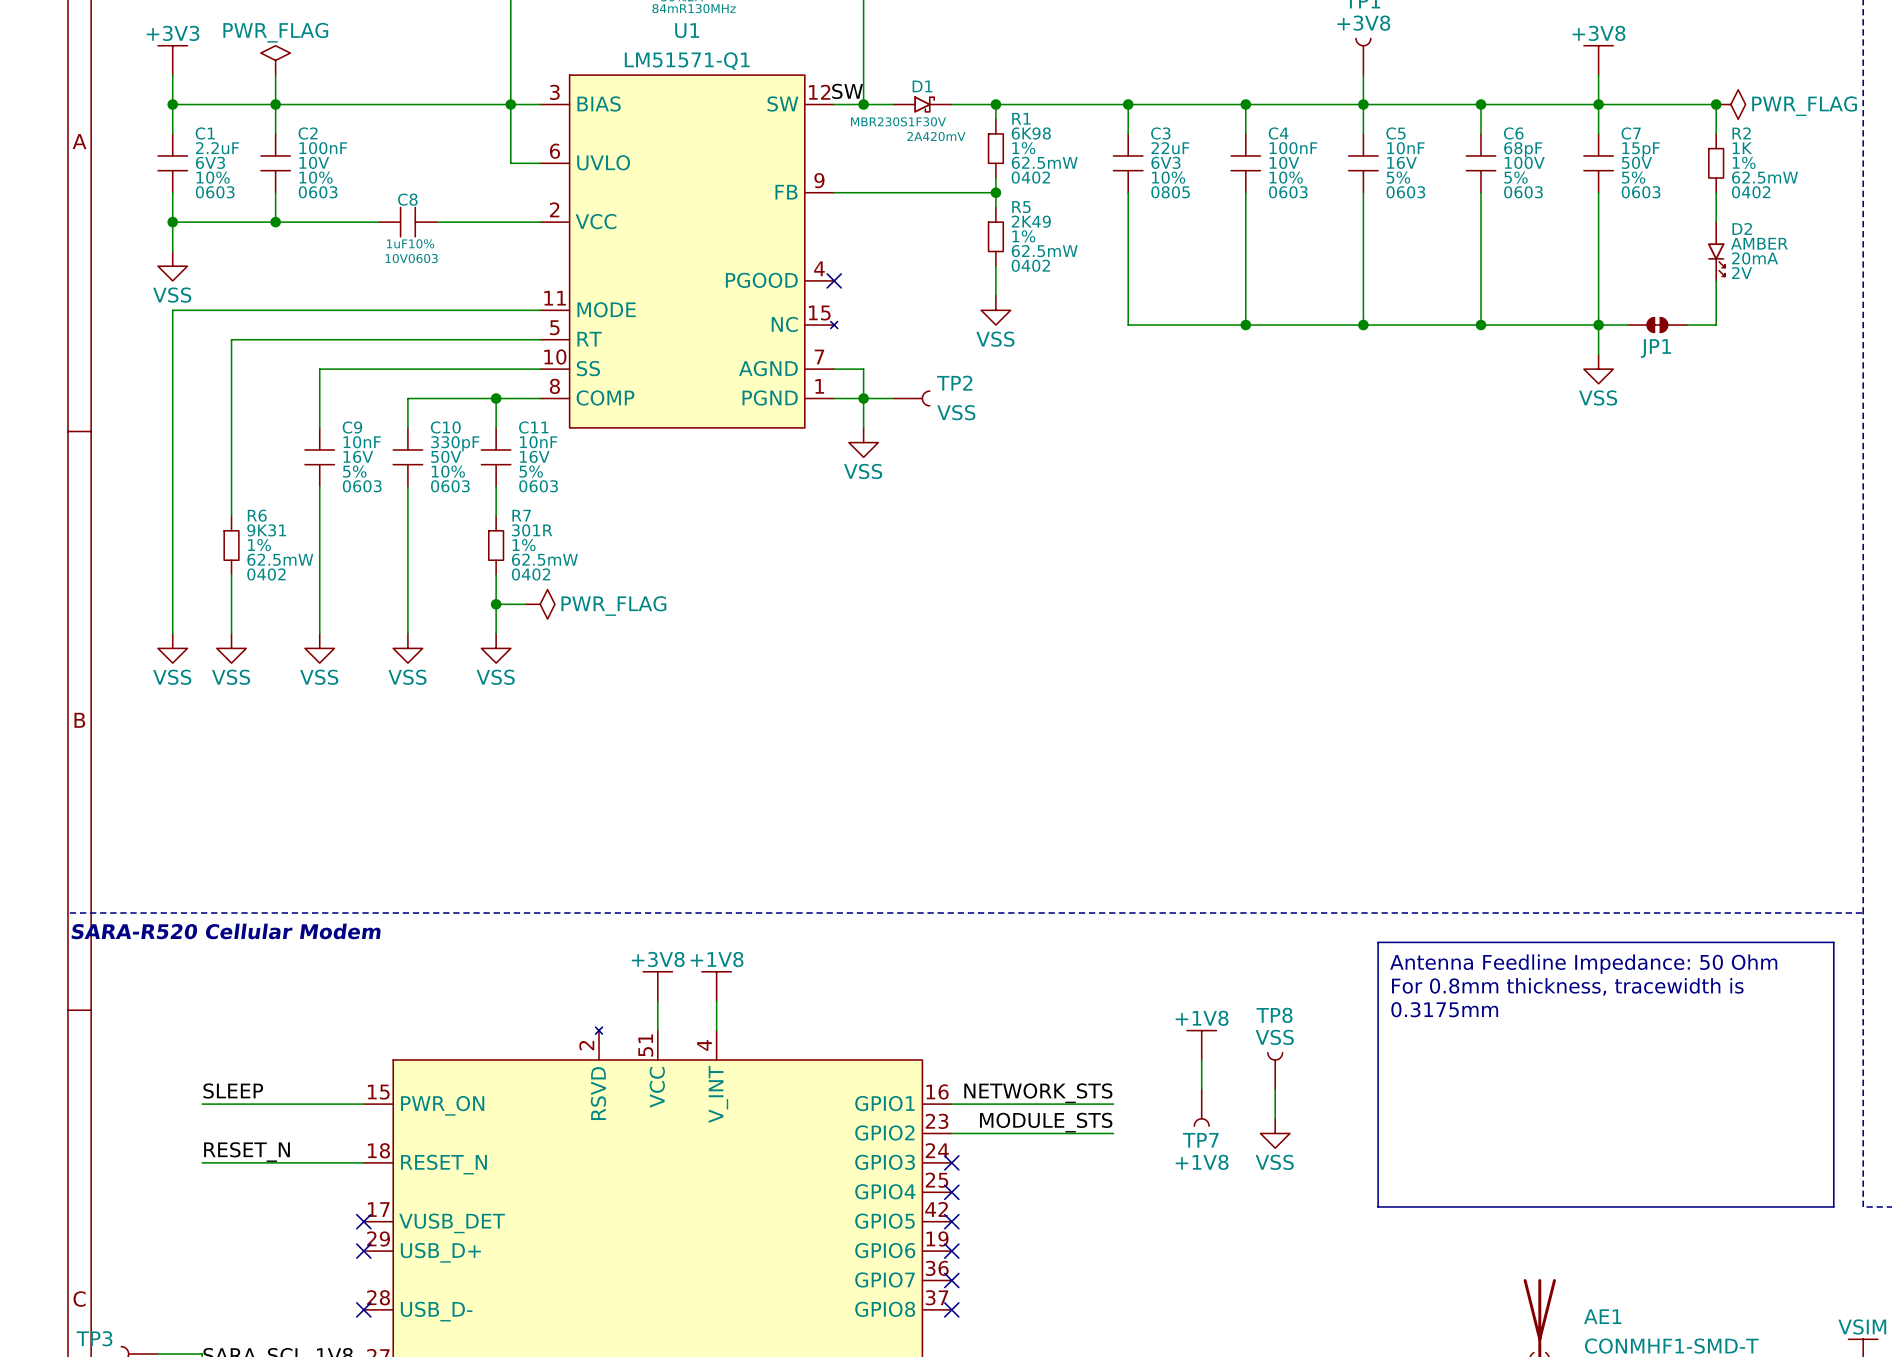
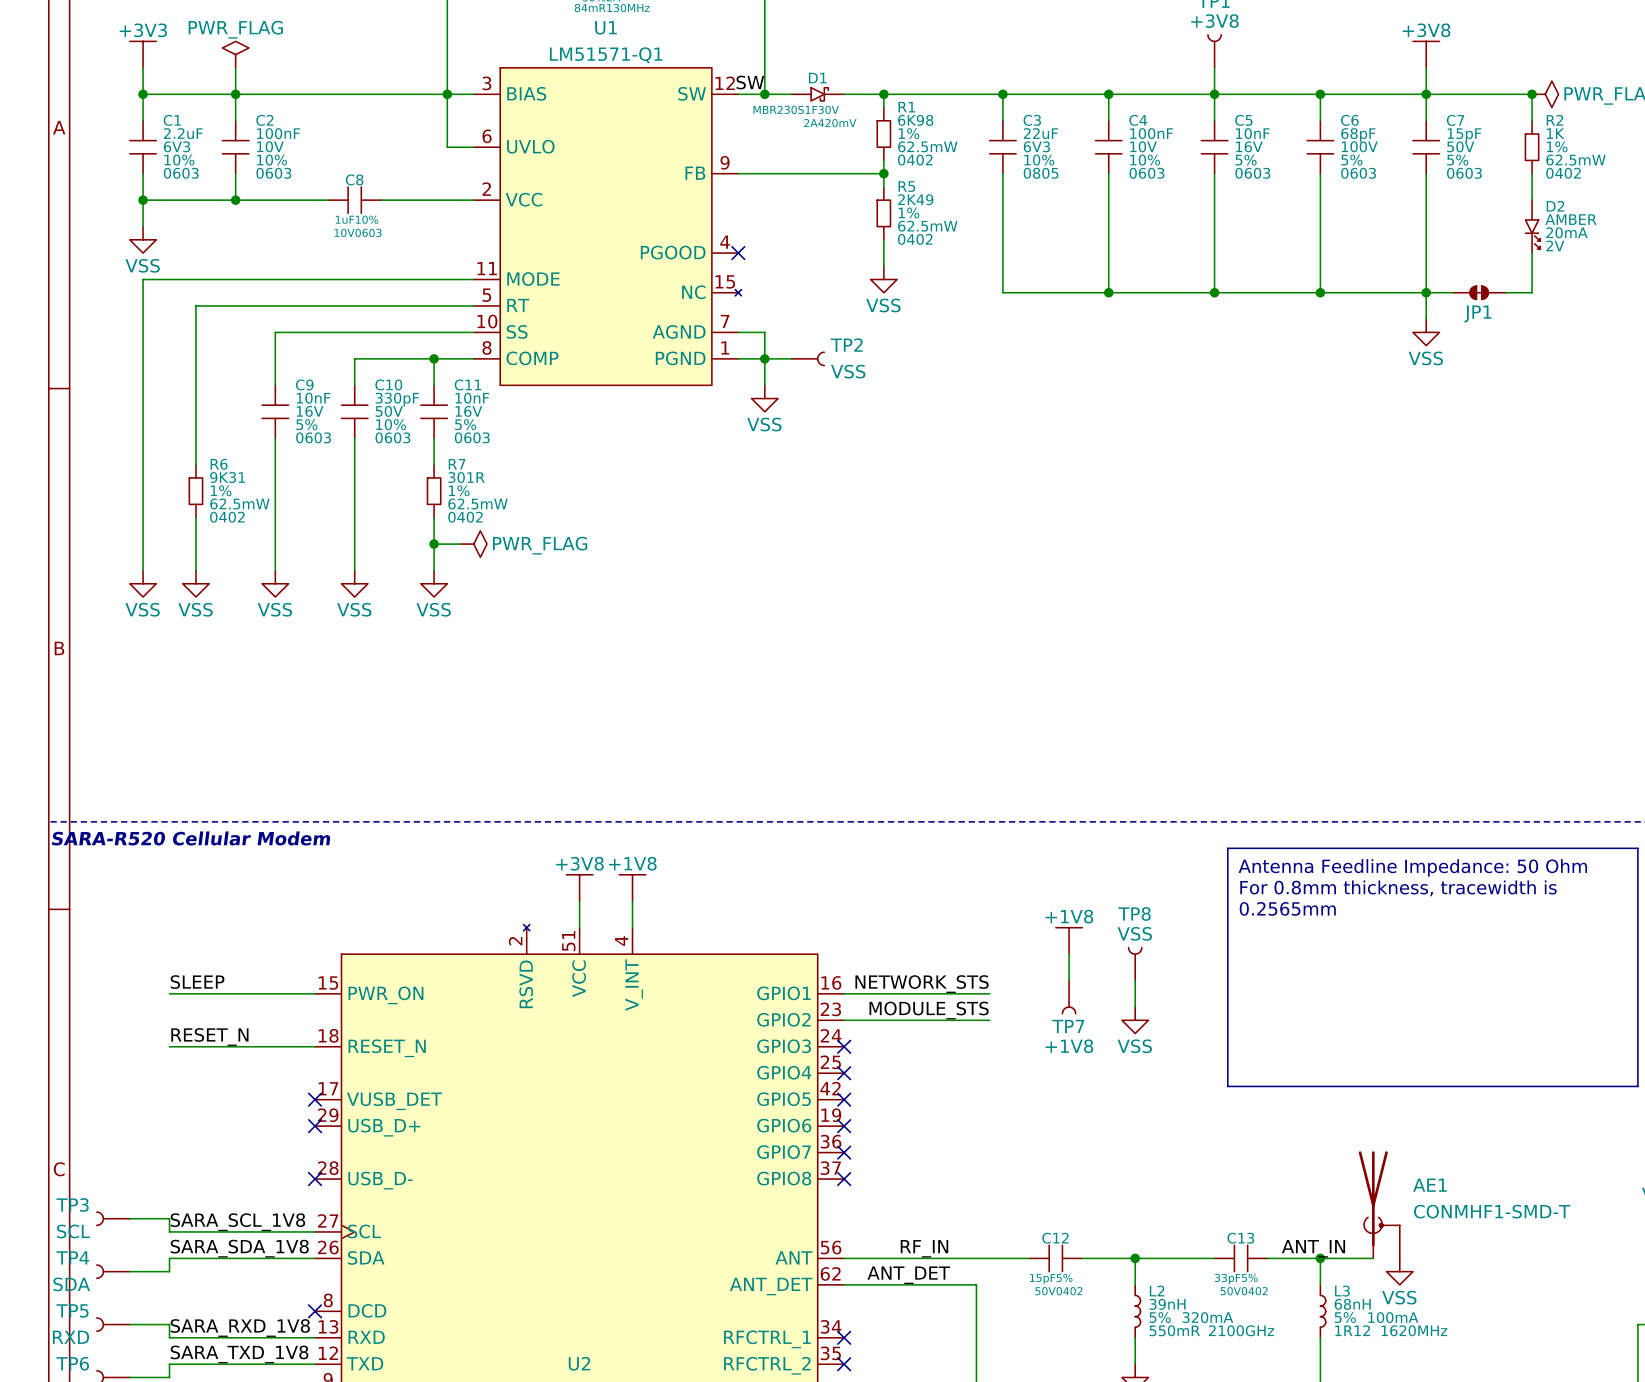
text: 0.3175mm (1444, 1009) -> 0.2565mm (1287, 908)

